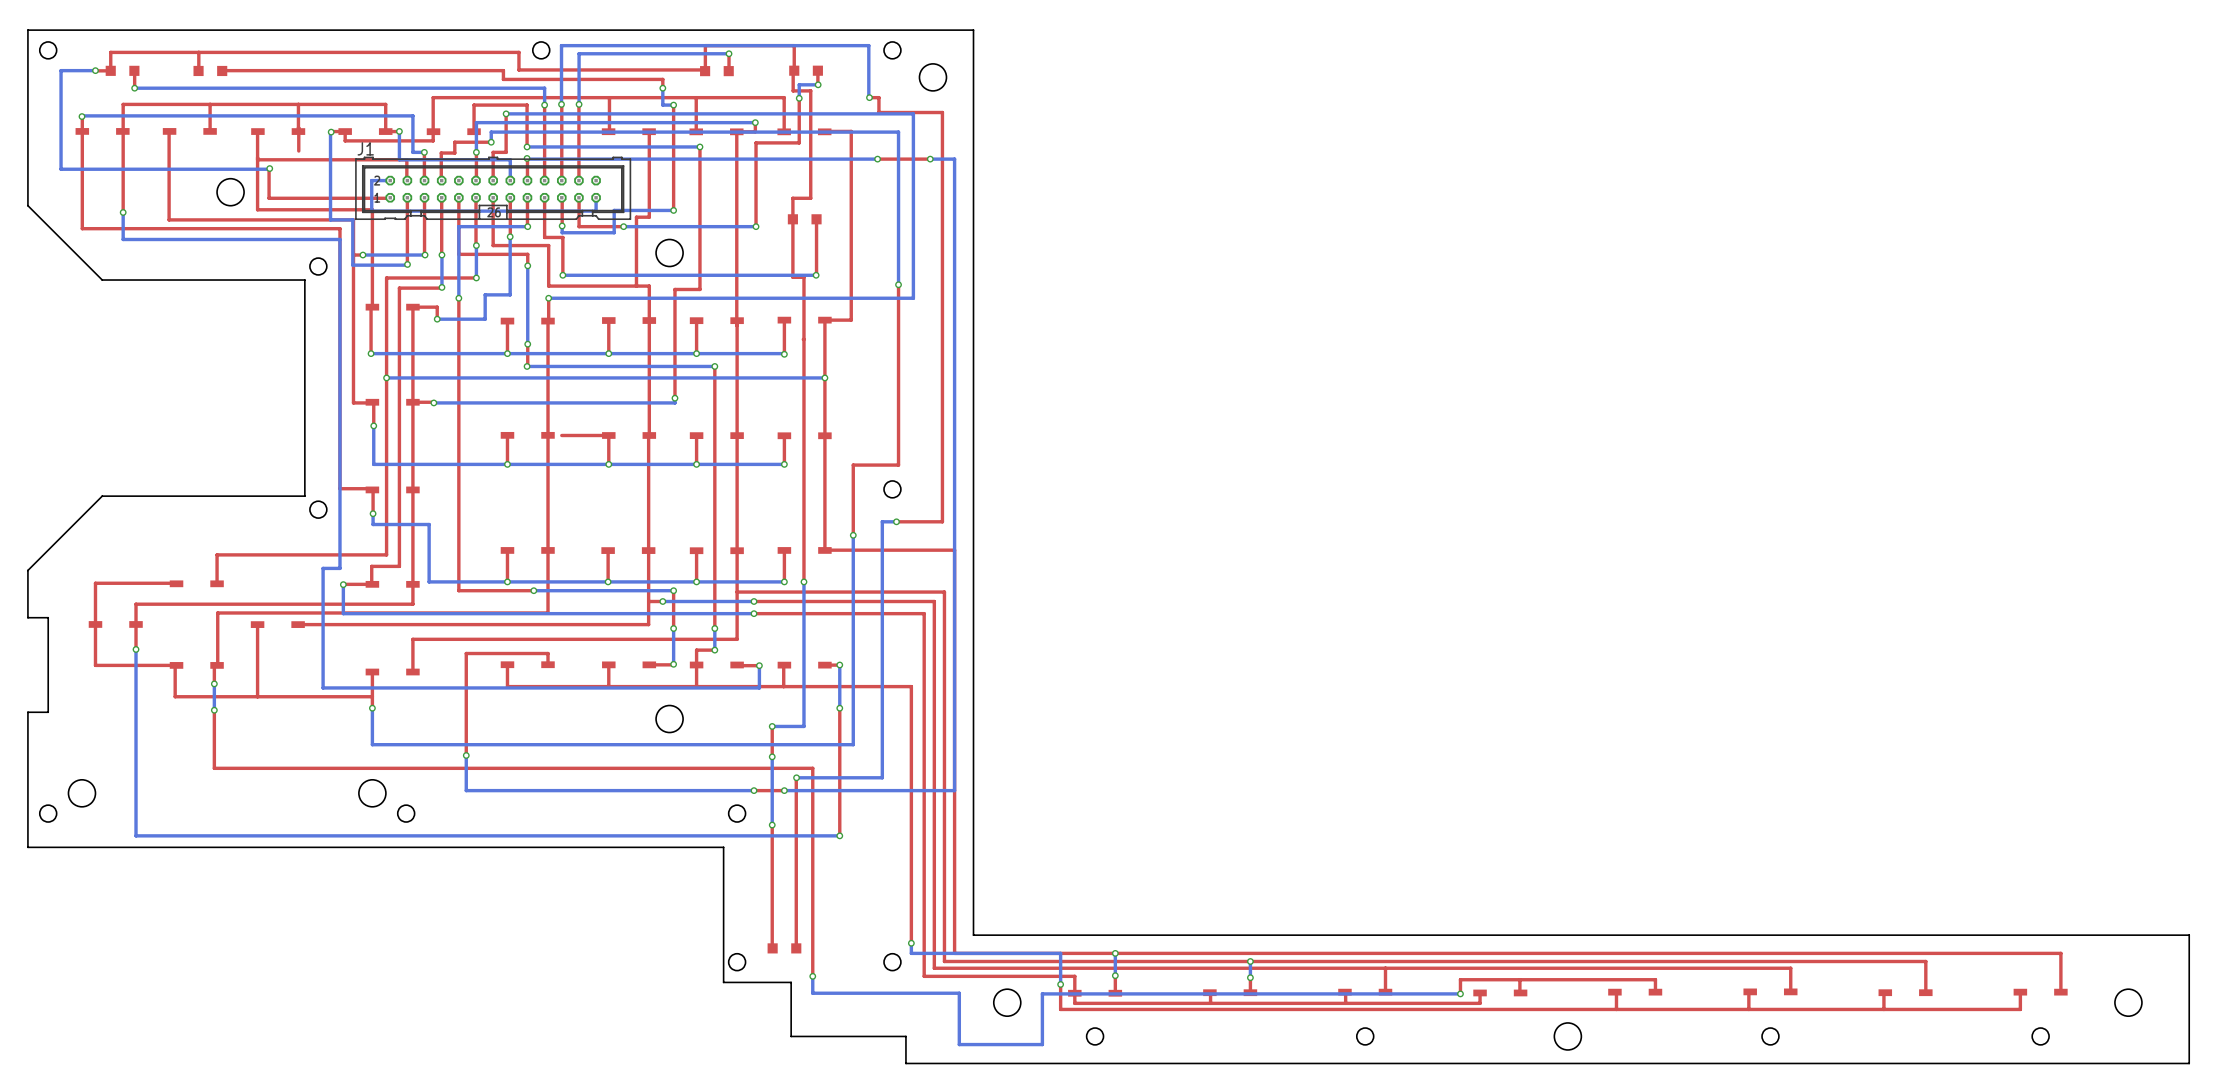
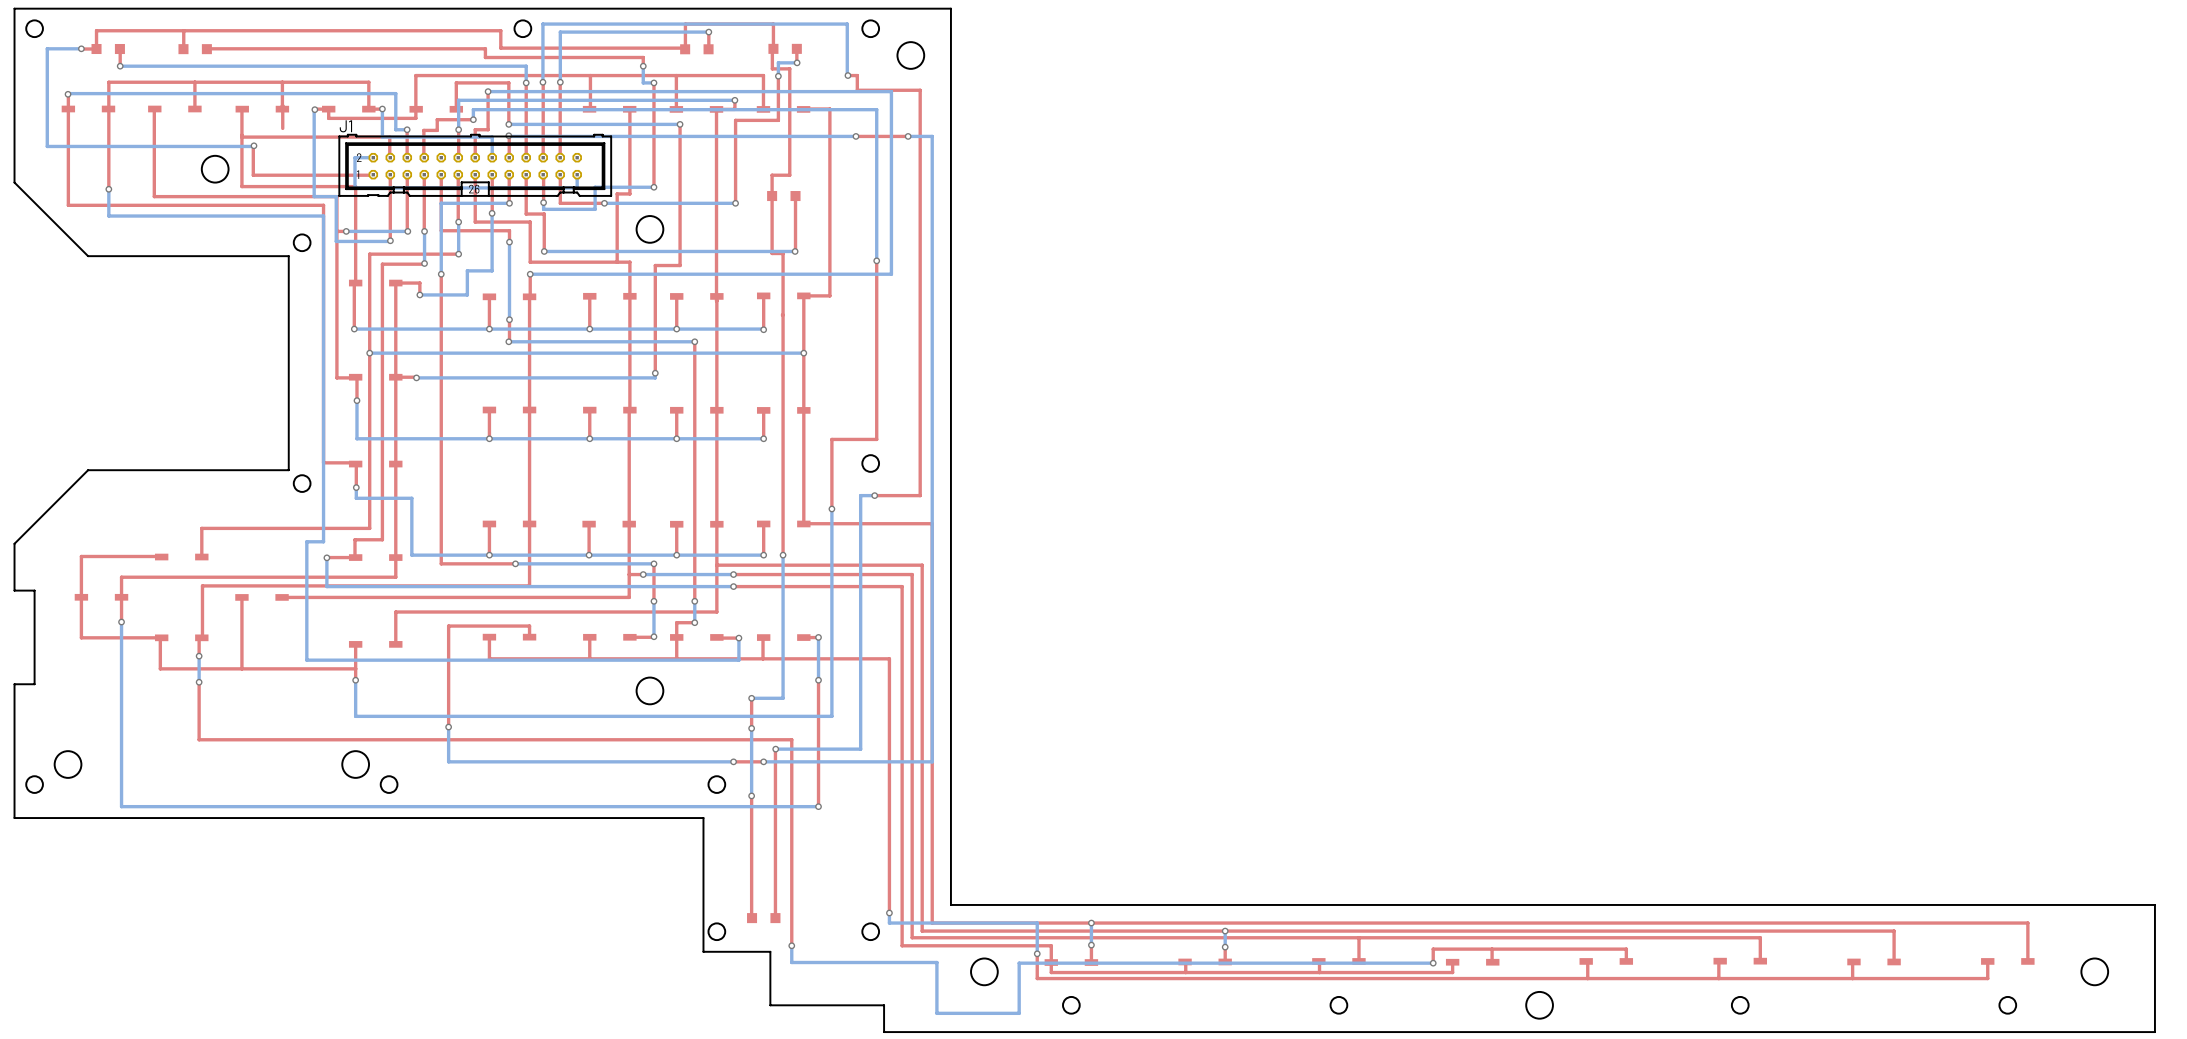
top track: (608, 435) (561, 435) -> none

